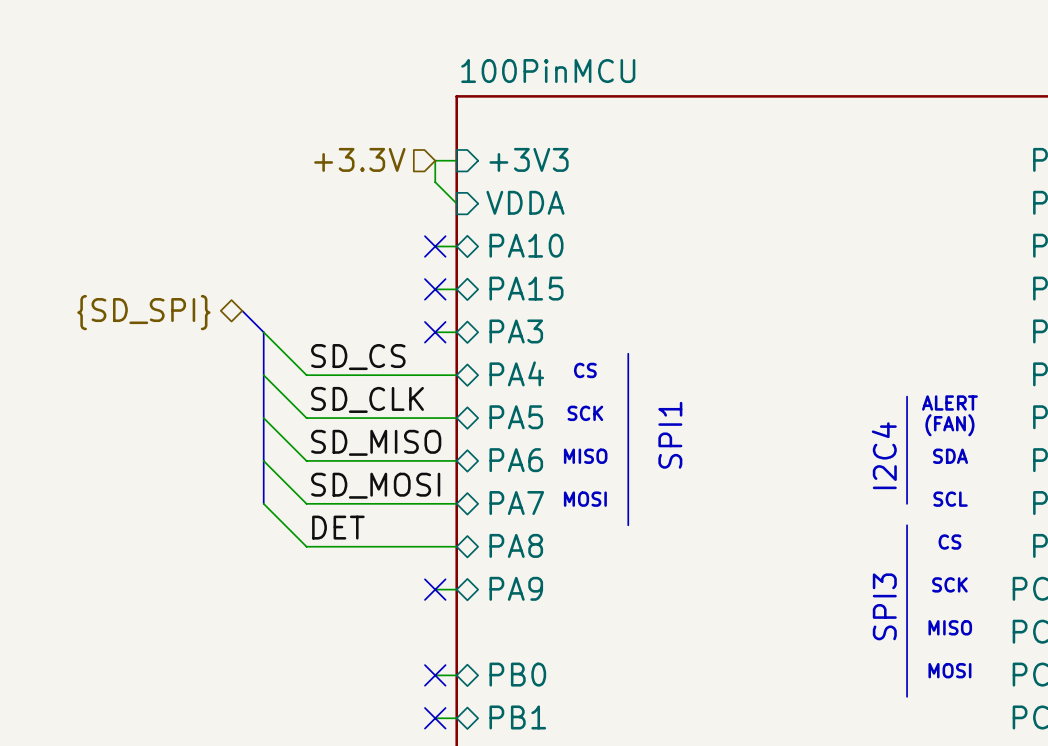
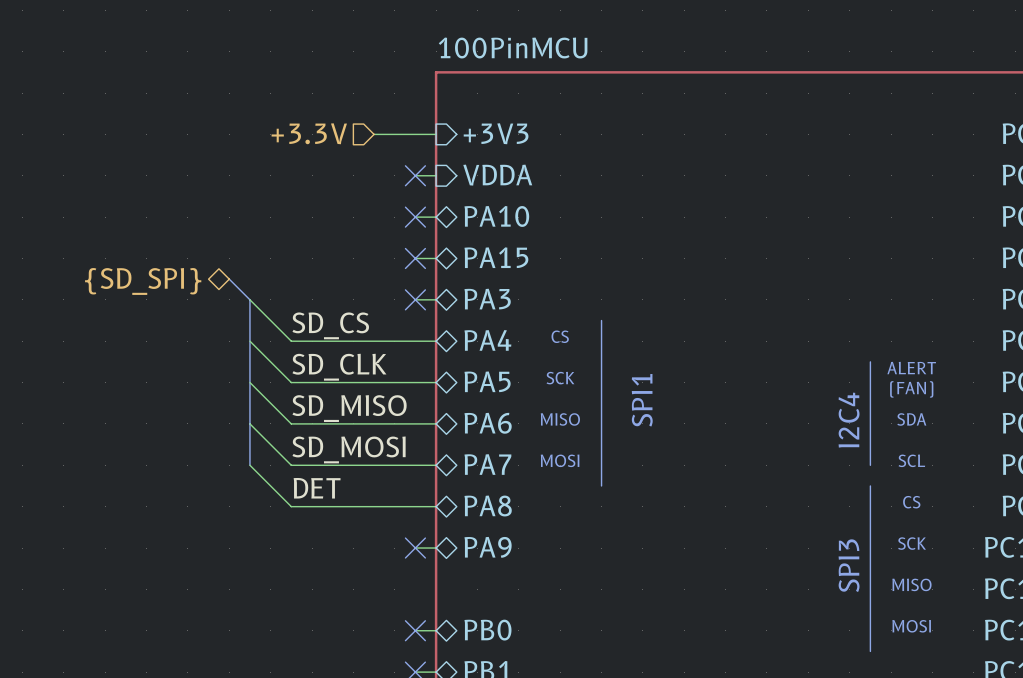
hierarchical label position: +3.3V (359, 159) -> +3.3V (309, 133)
wire: none -> (374, 134) (415, 134)
wire: (435, 160) (435, 182) (456, 203) -> (415, 175) (436, 175)
no-connect mark: none -> (415, 175)

